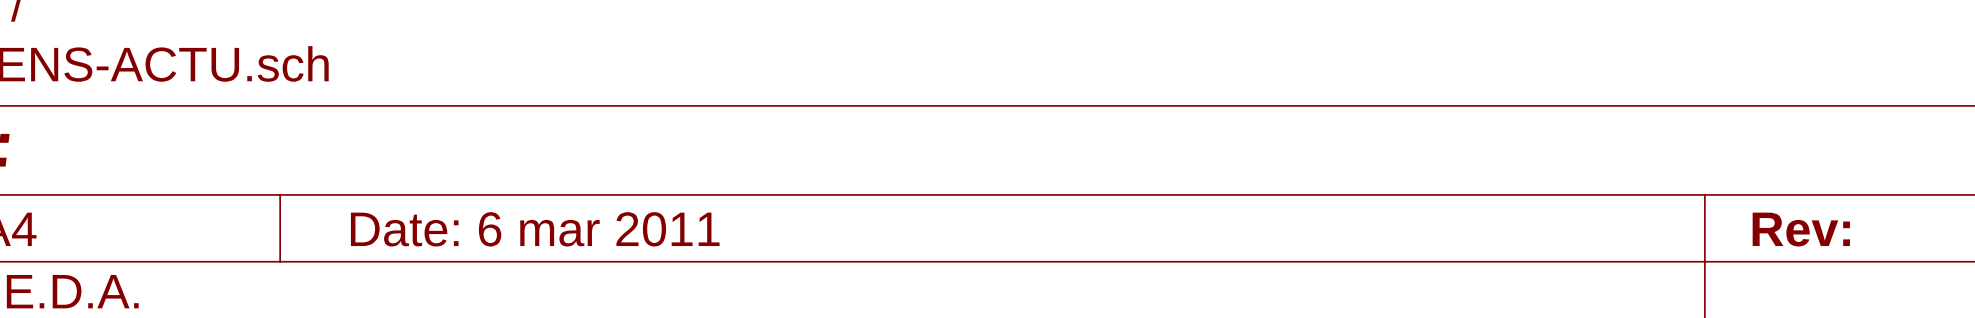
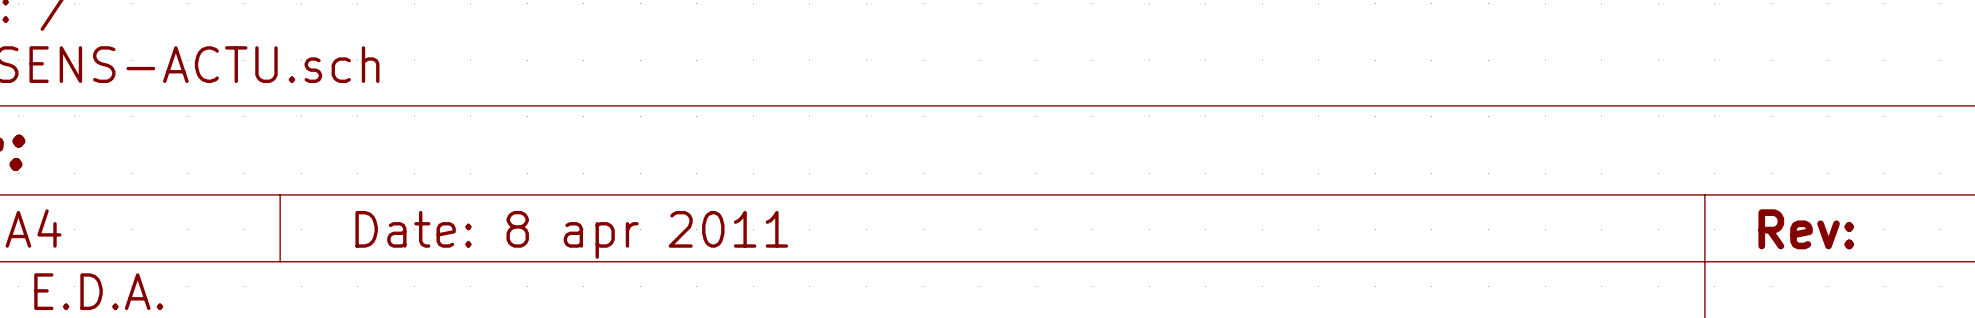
title block: Date: 6 mar 2011 (535, 229) -> Date: 8 apr 2011 (571, 234)

